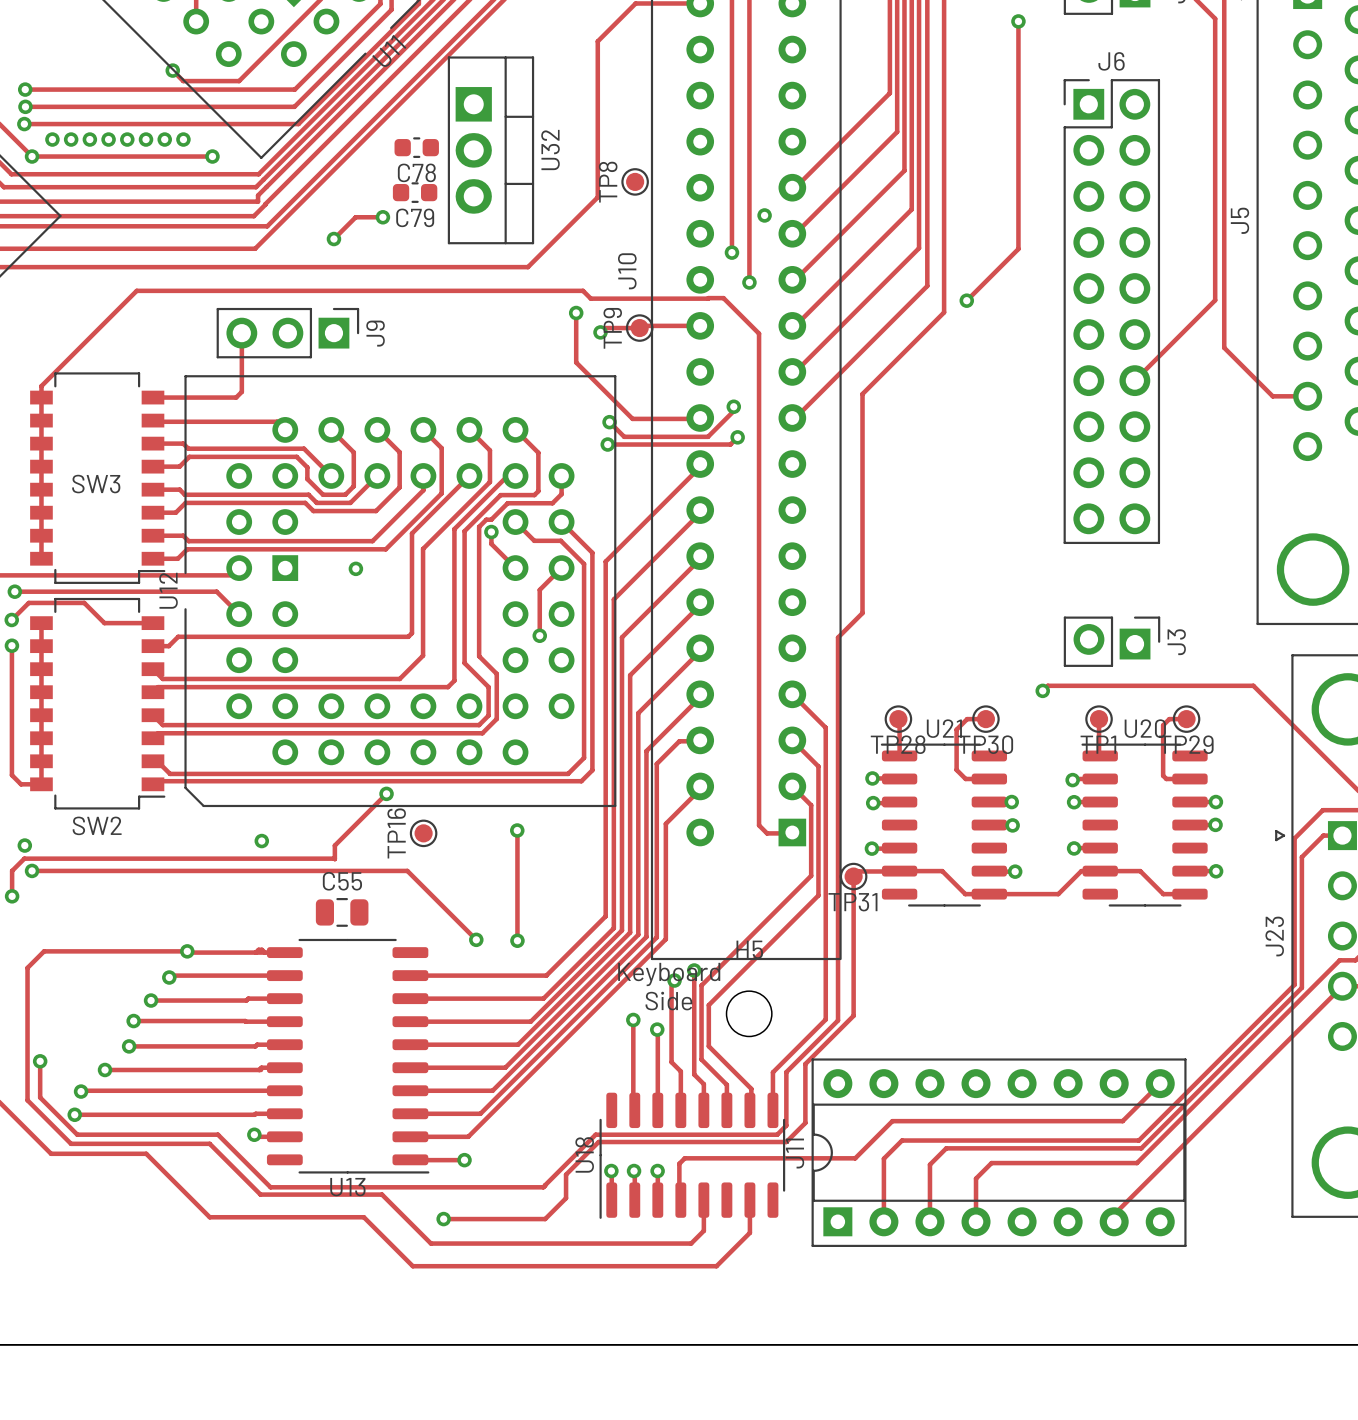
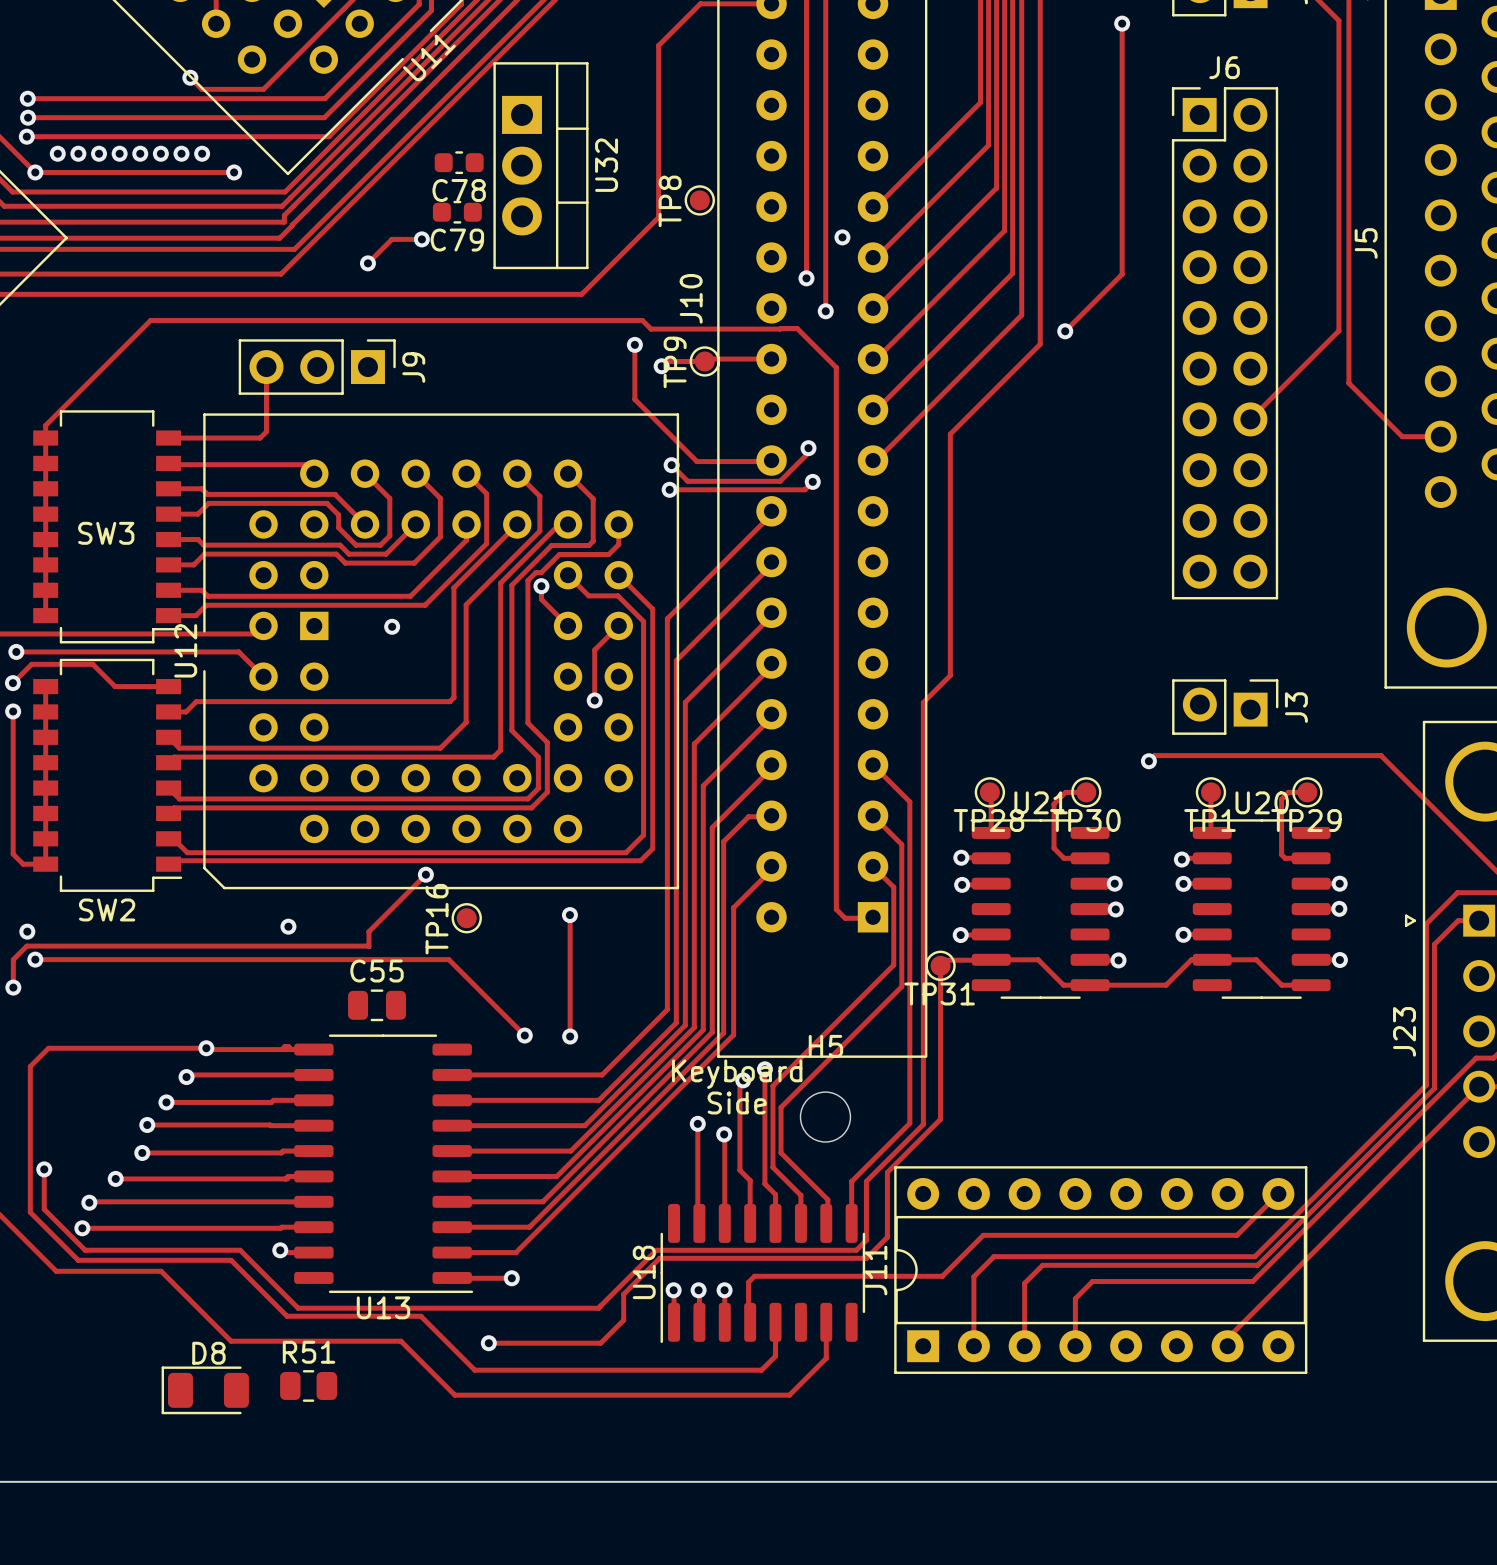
R51: none -> (308, 1385)
D8: none -> (205, 1390)

